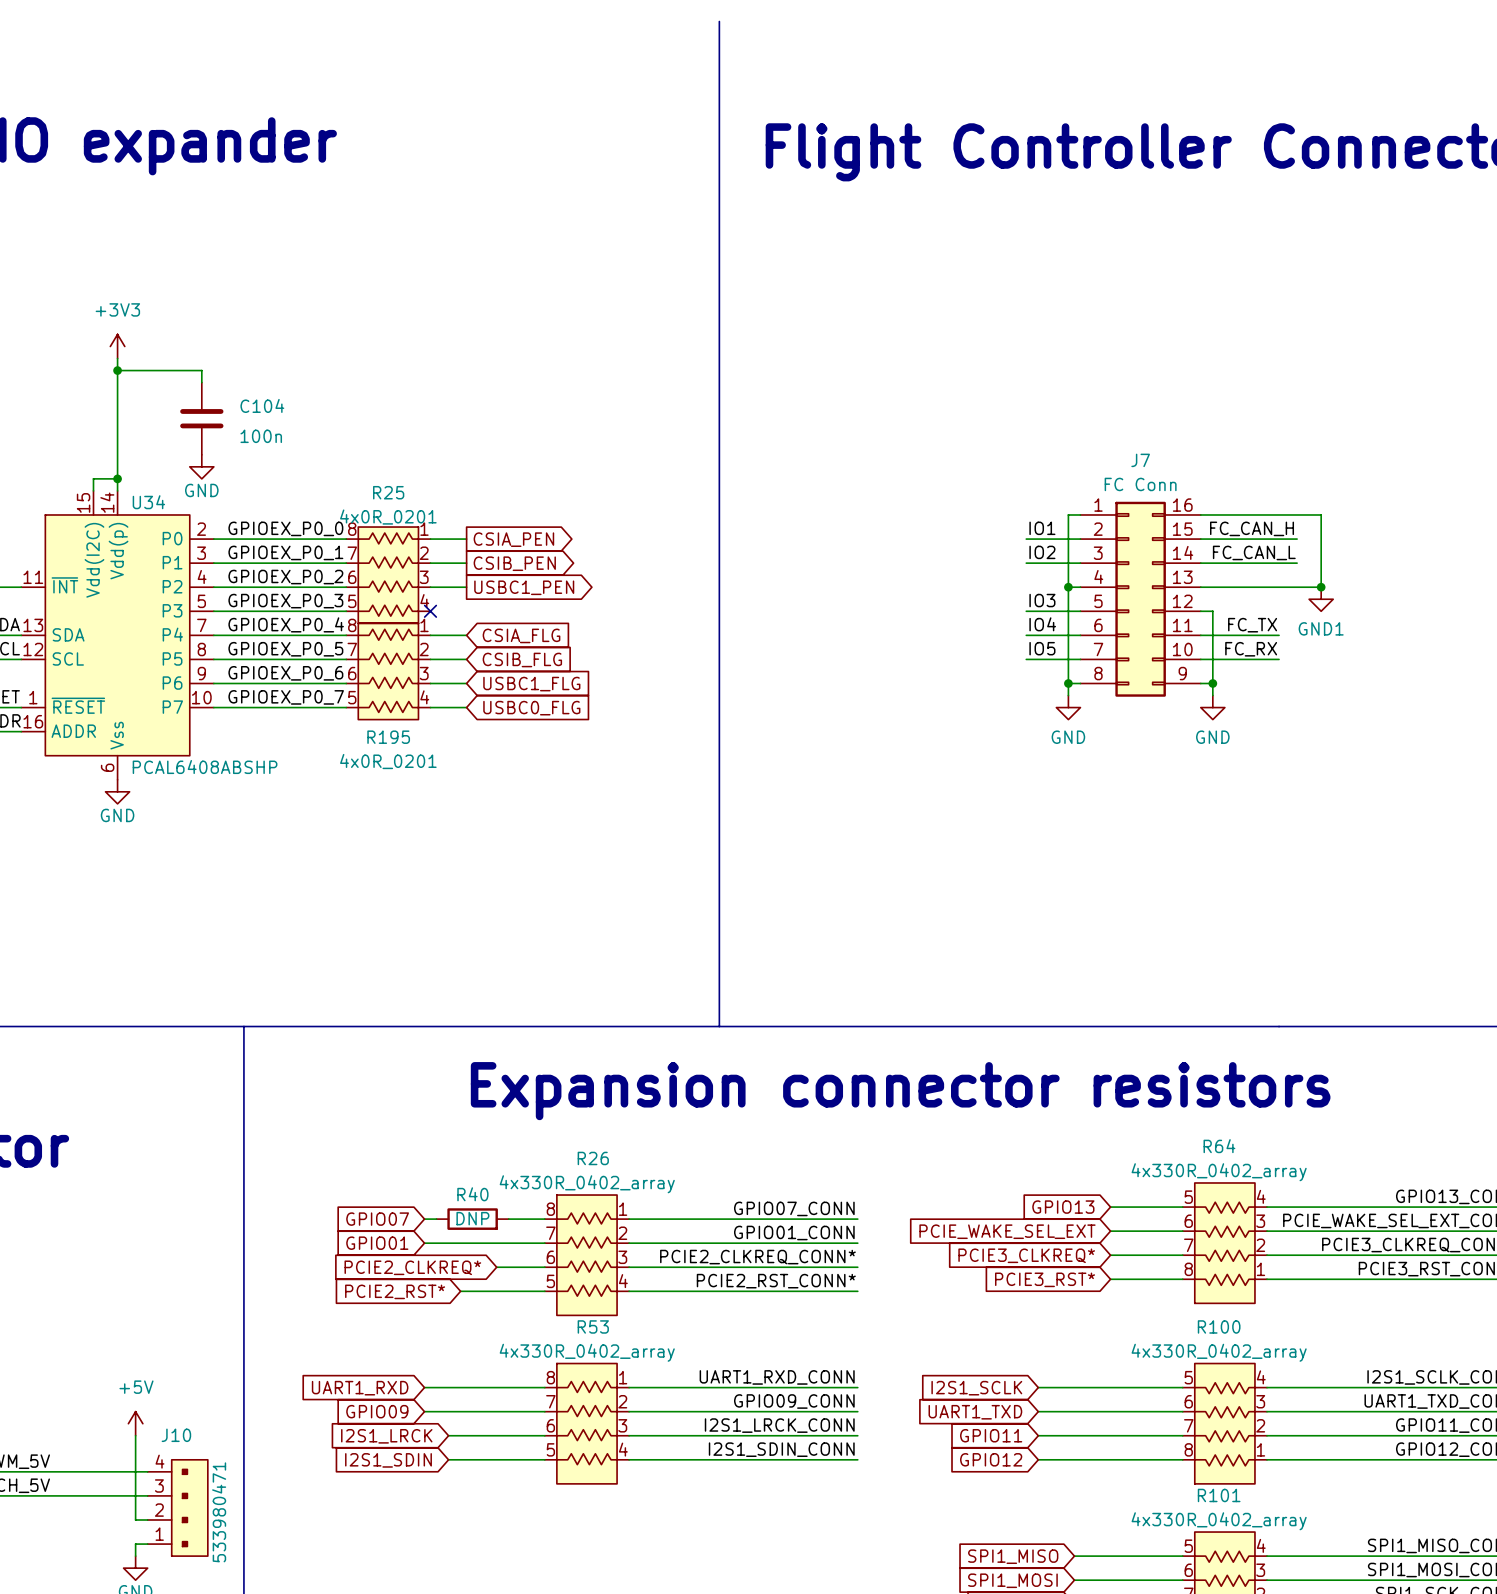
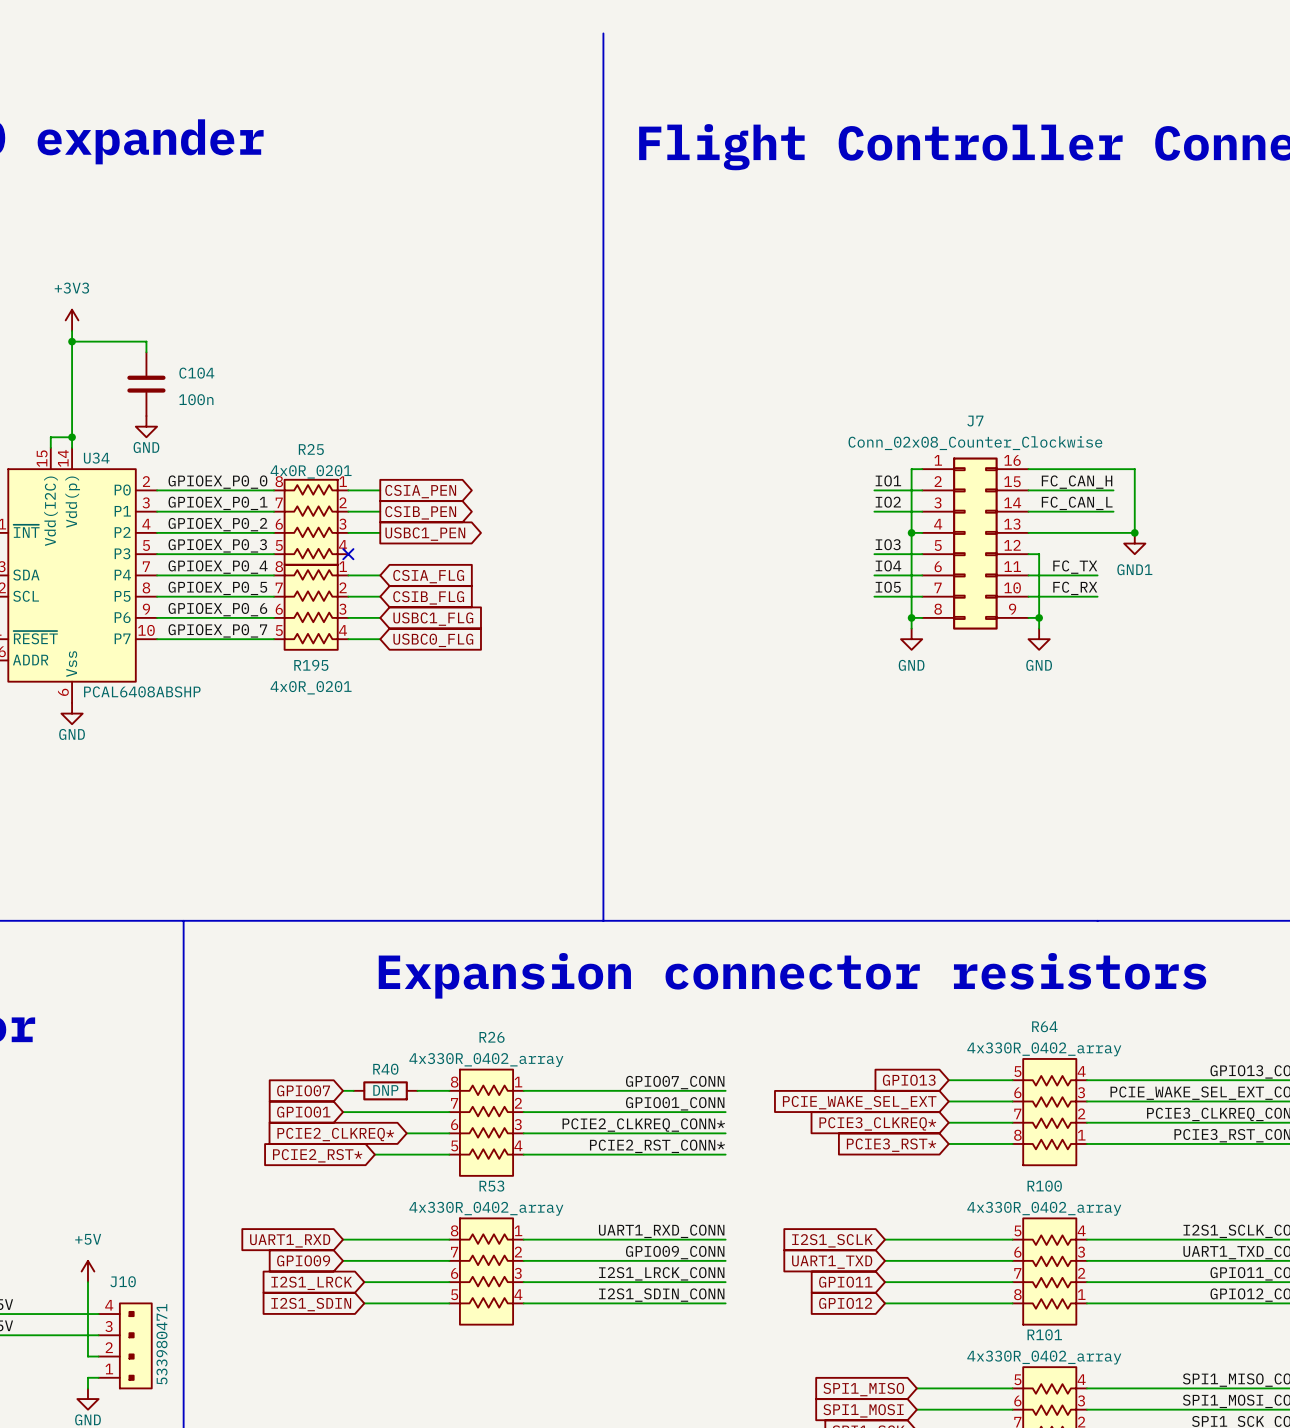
J7 value: FC Conn (1140, 484) -> Conn_02x08_Counter_Clockwise (975, 443)

